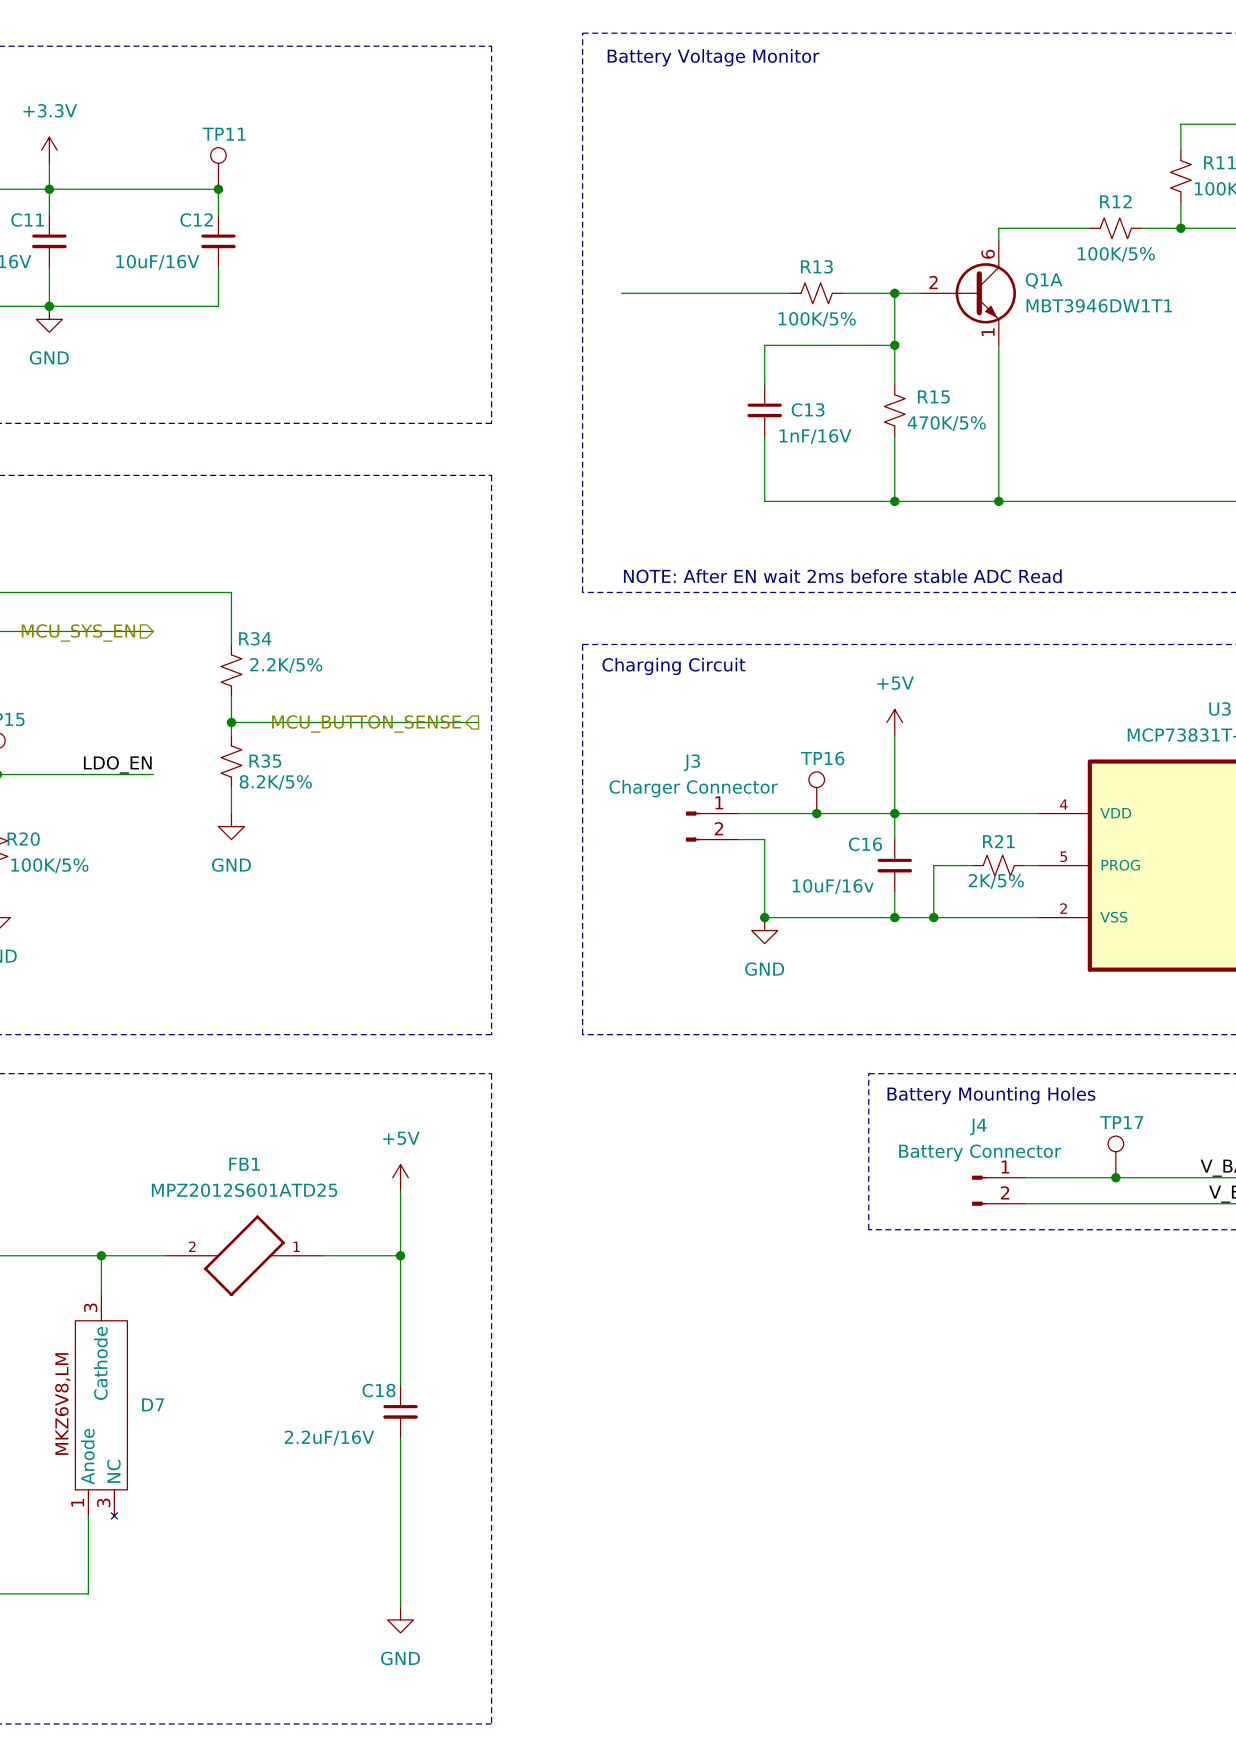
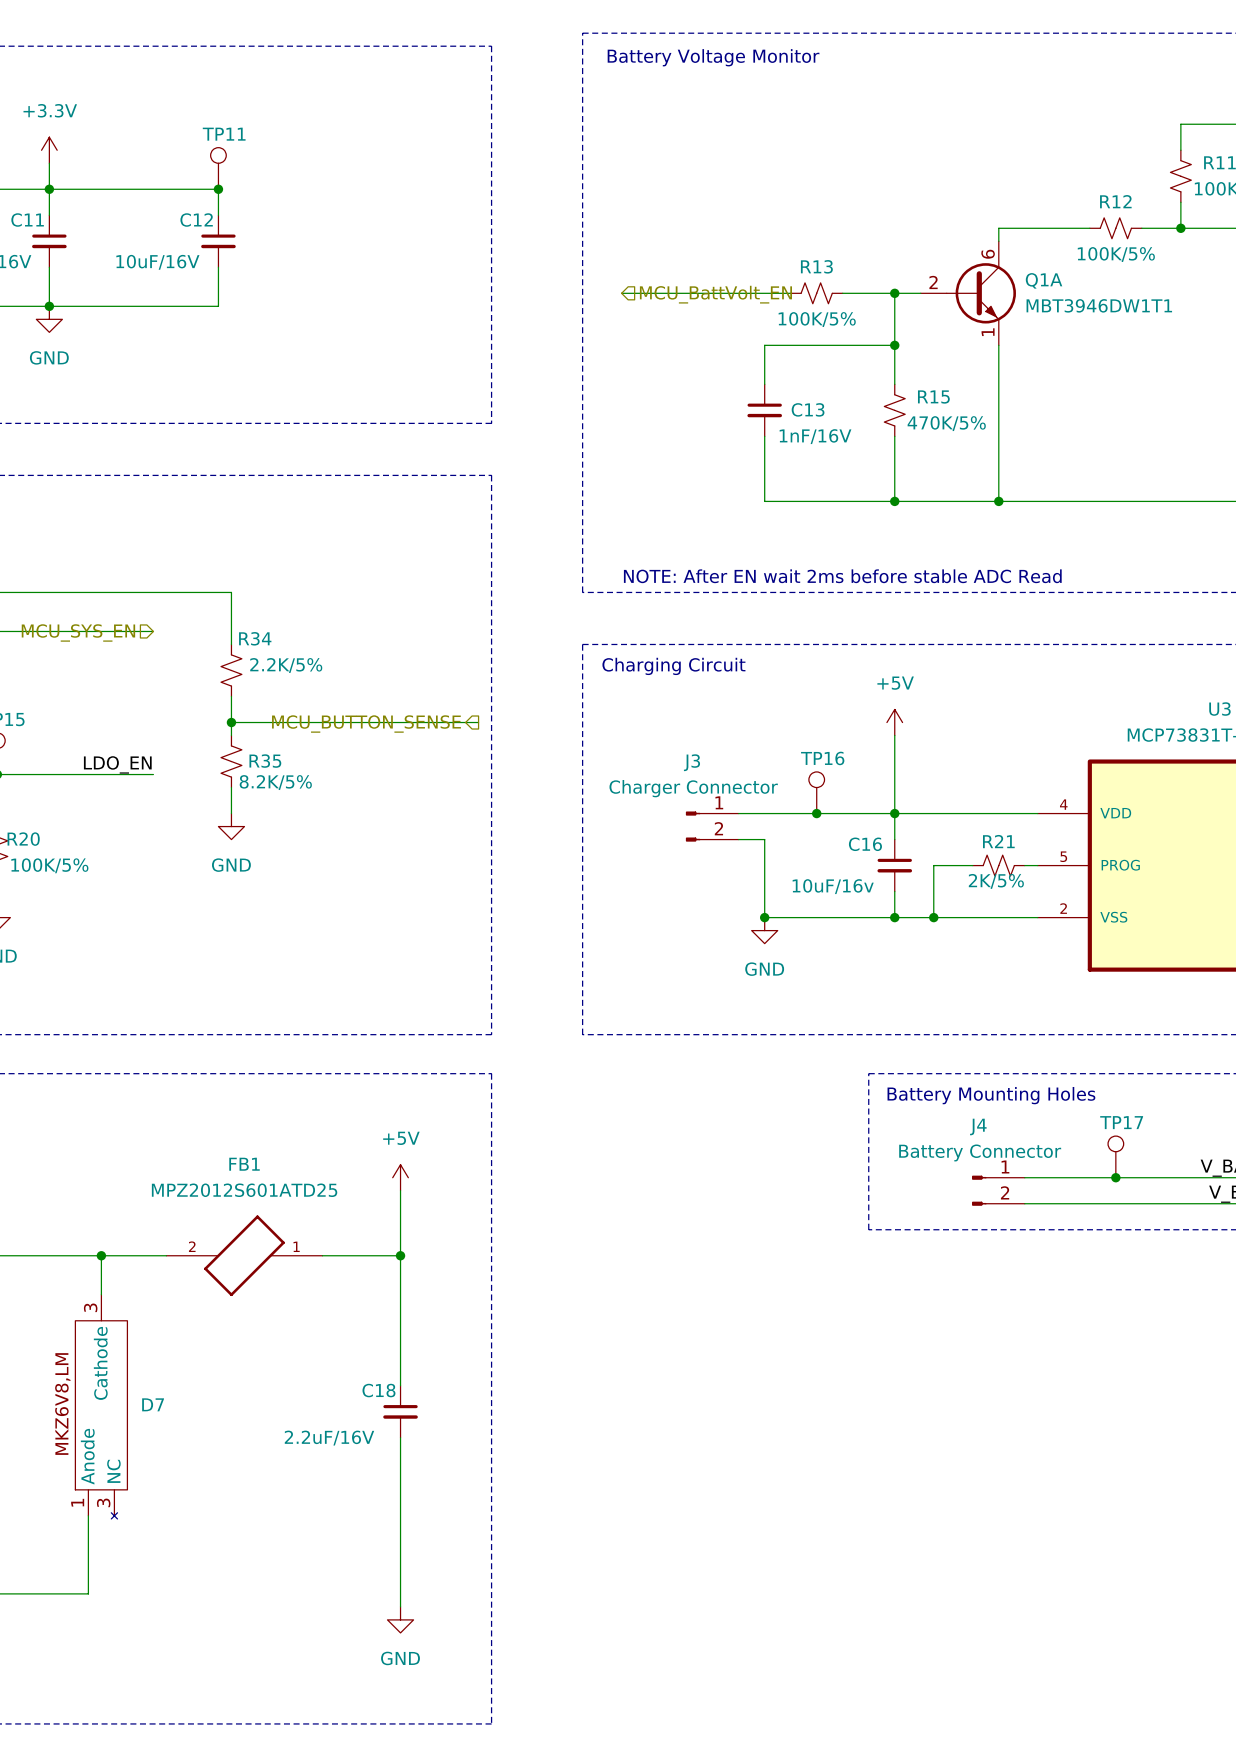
hierarchical label: none -> MCU_BattVolt_EN (715, 294)

